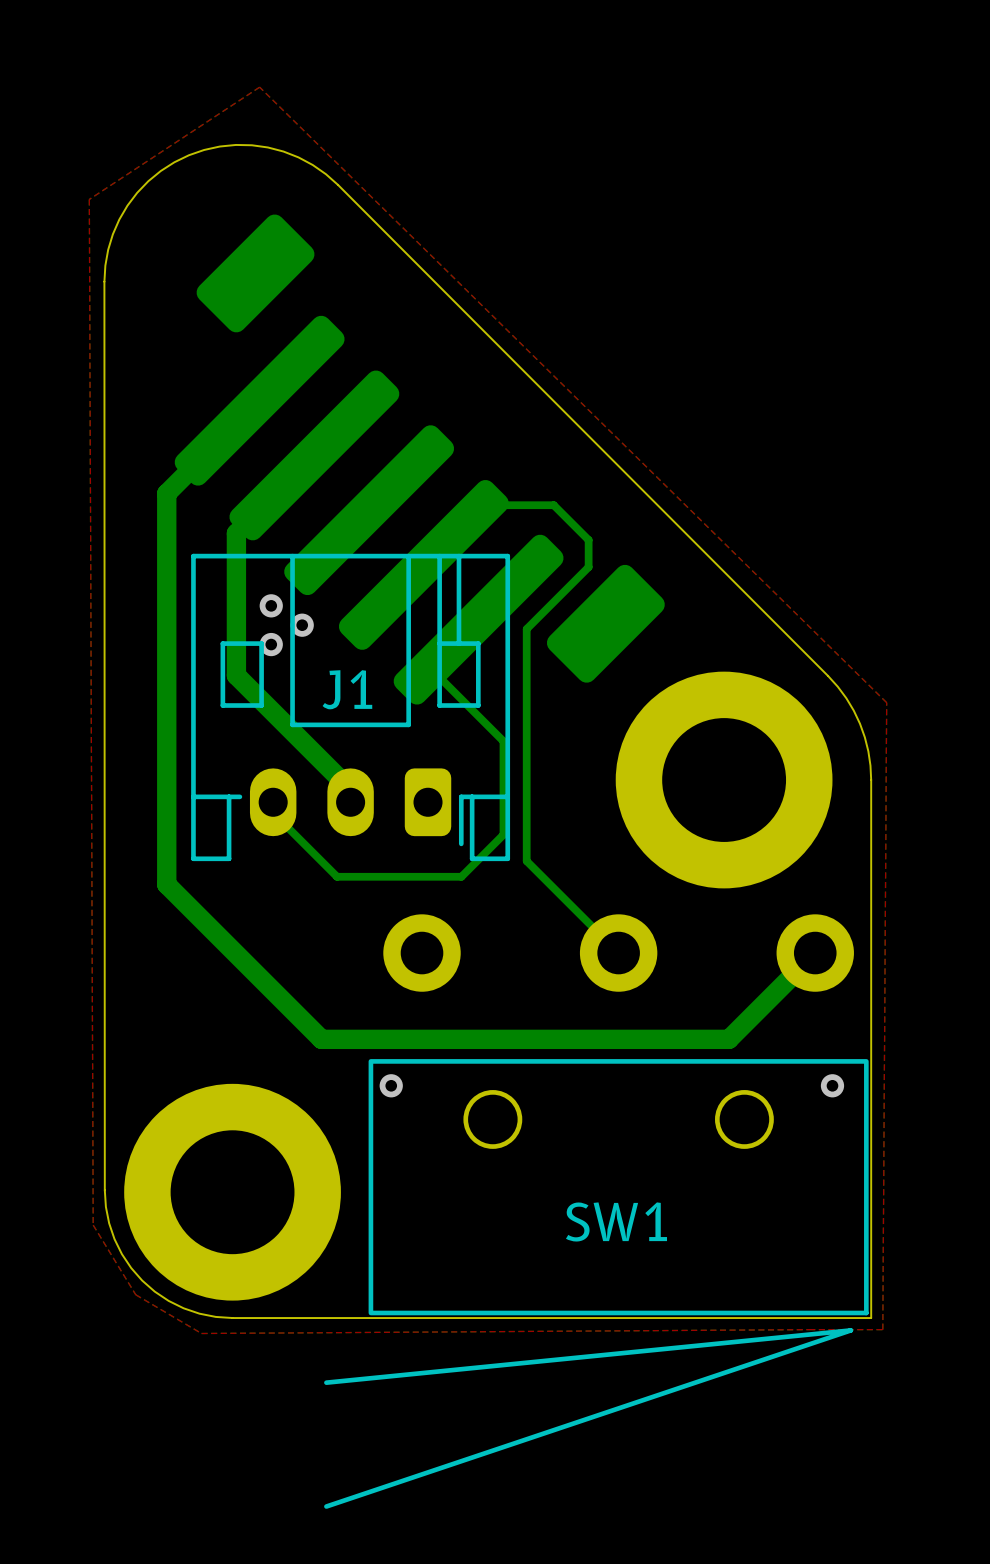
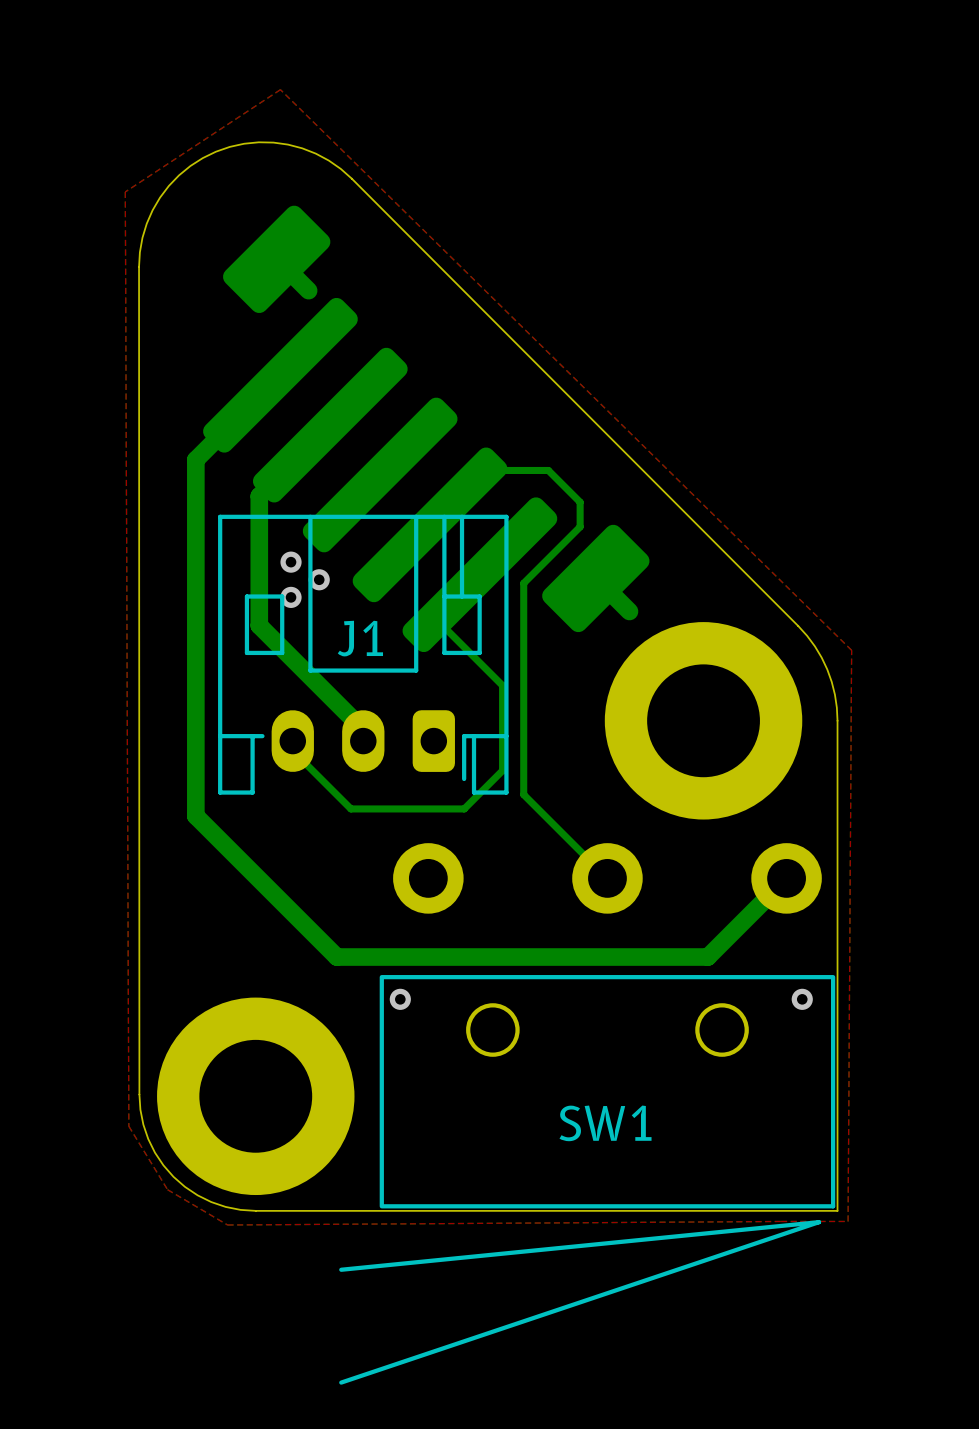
bottom track: none -> (277, 259) (308, 290)
bottom track: none -> (596, 578) (629, 611)

